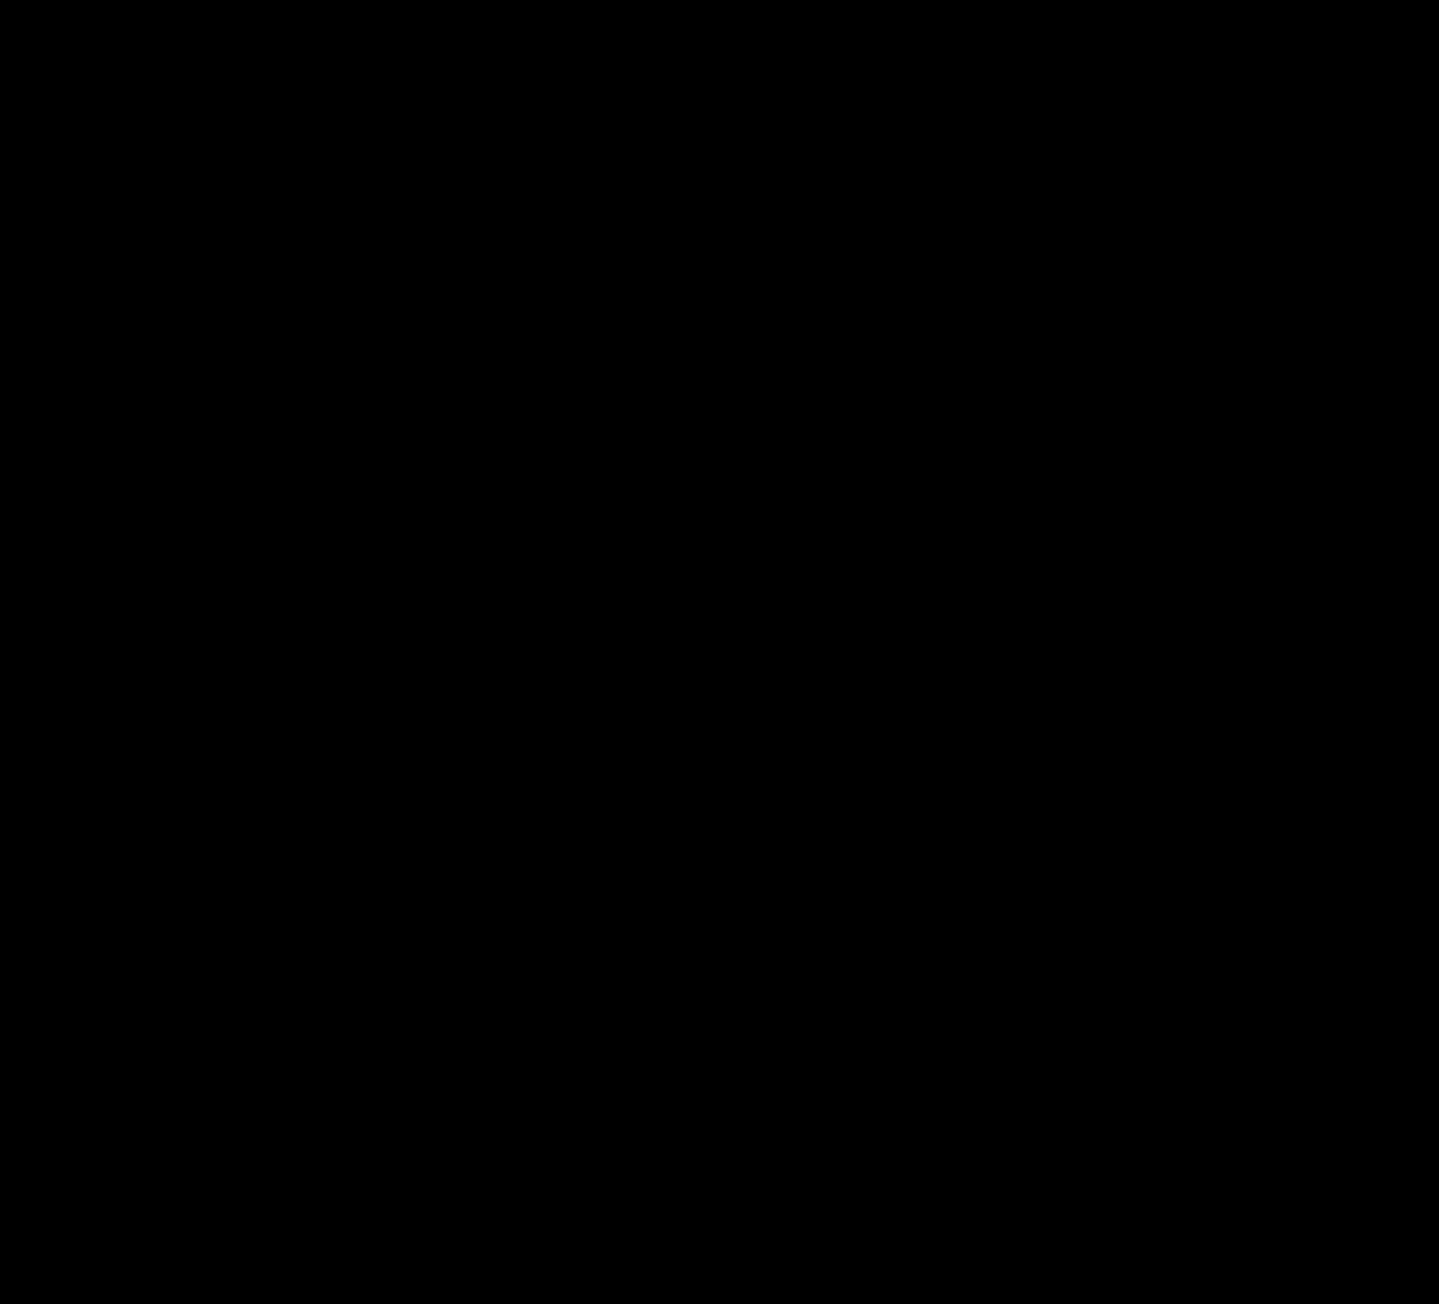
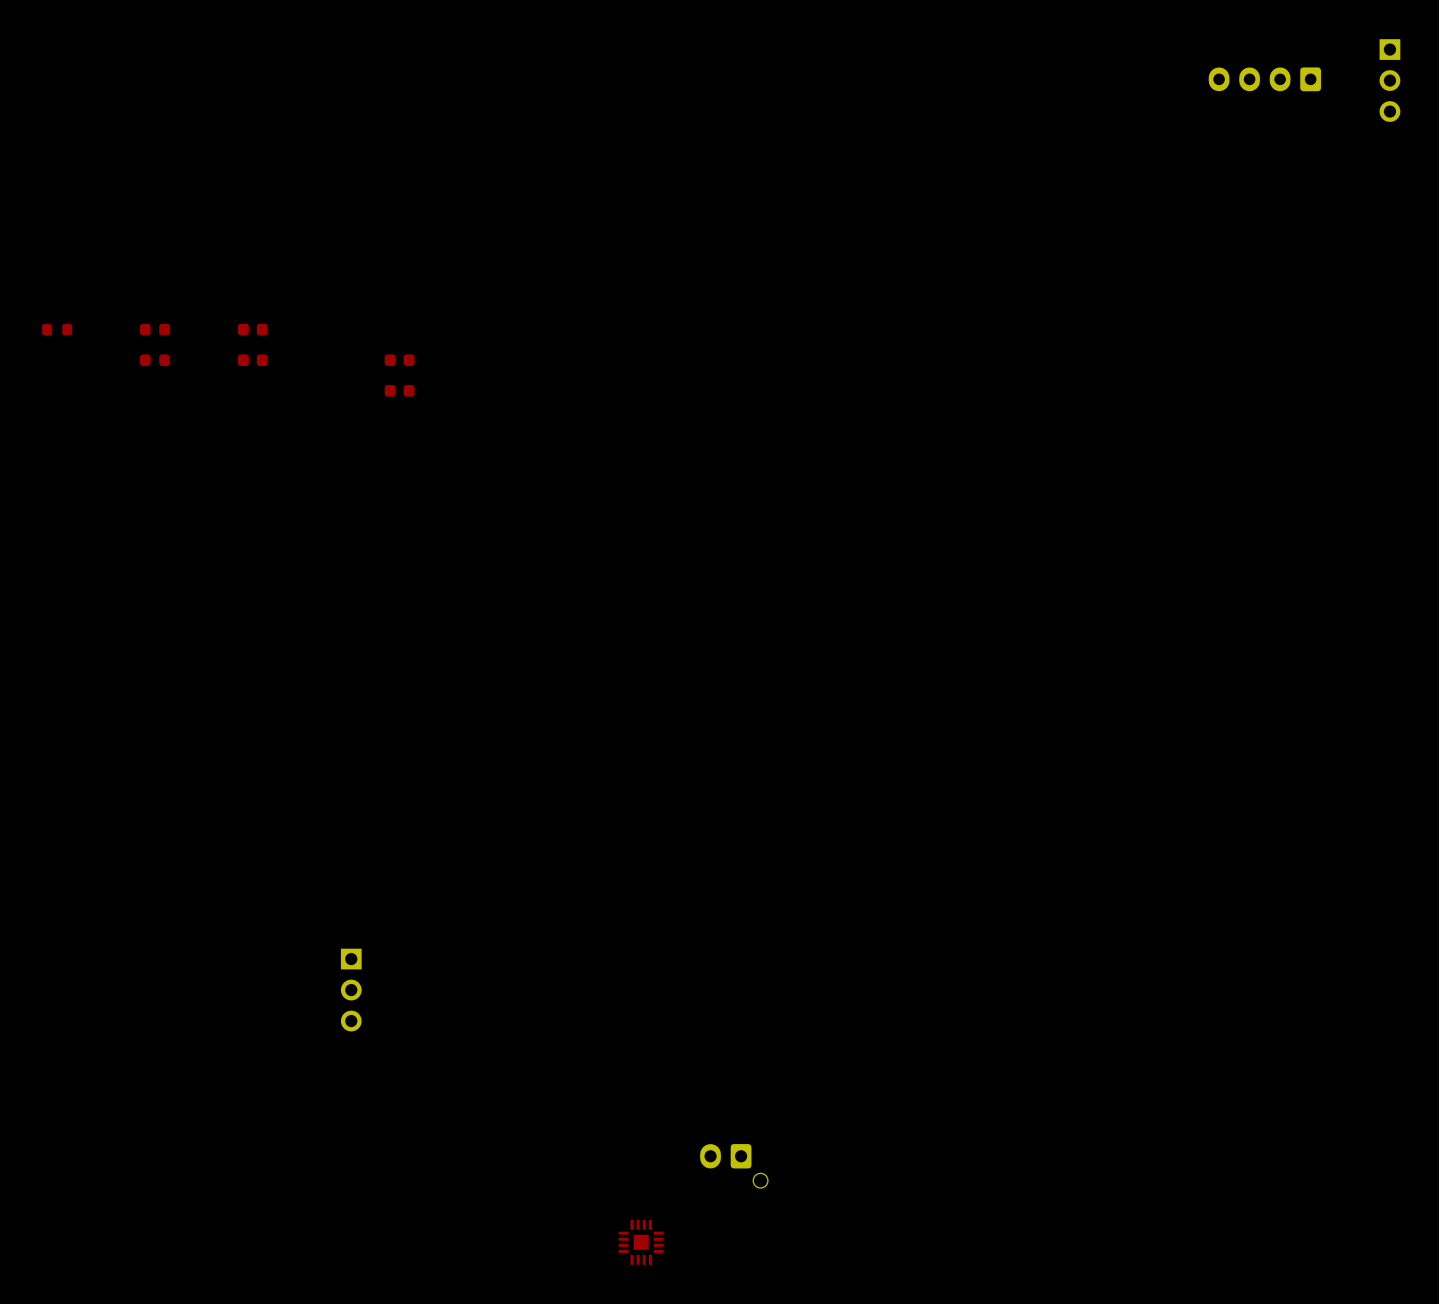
part: none -> (1264, 79)
part: none -> (1389, 80)
part: none -> (57, 329)
part: none -> (154, 329)
part: none -> (252, 329)
part: none -> (154, 360)
part: none -> (252, 360)
part: none -> (399, 360)
part: none -> (399, 390)
part: none -> (351, 990)
part: none -> (734, 1166)
part: none -> (641, 1242)

